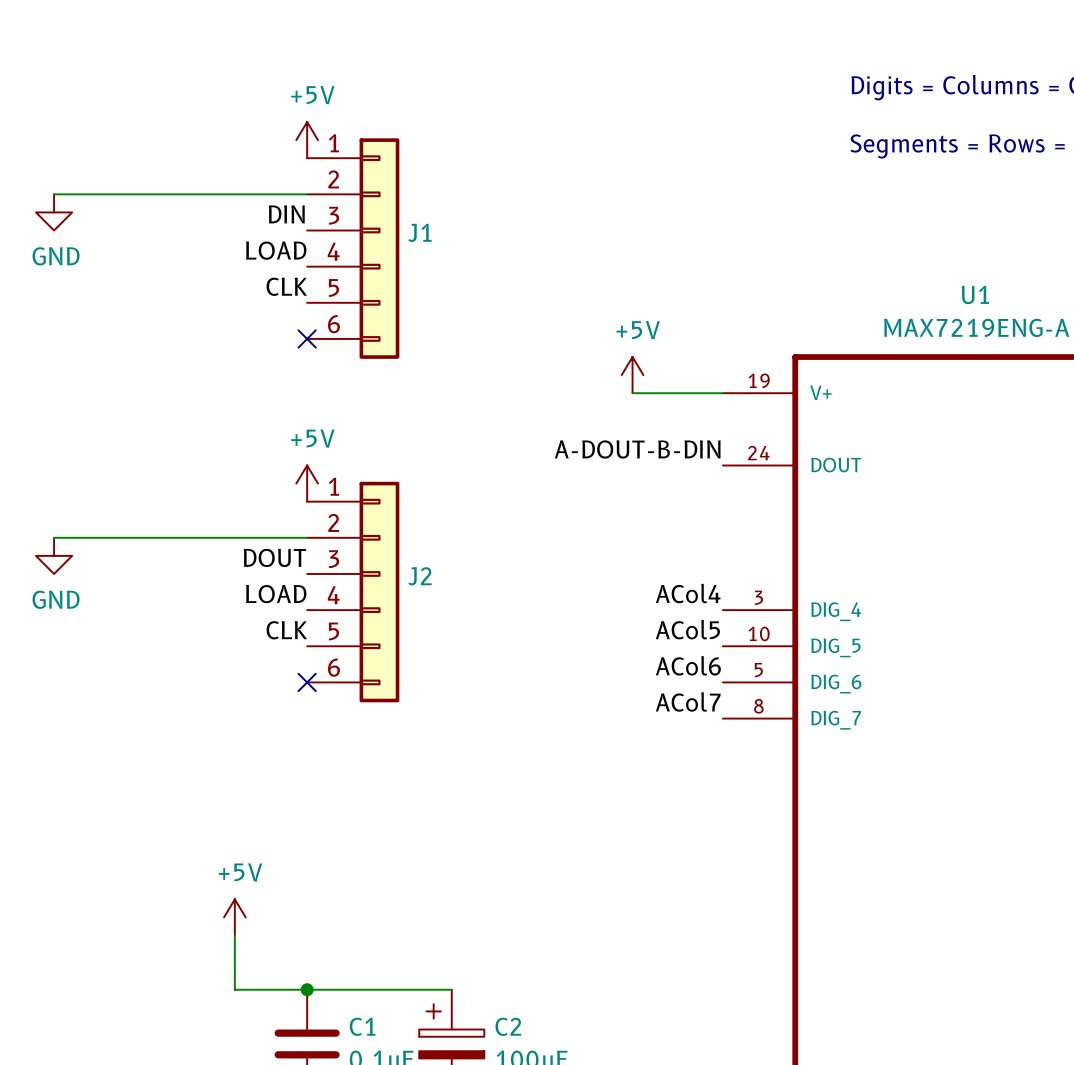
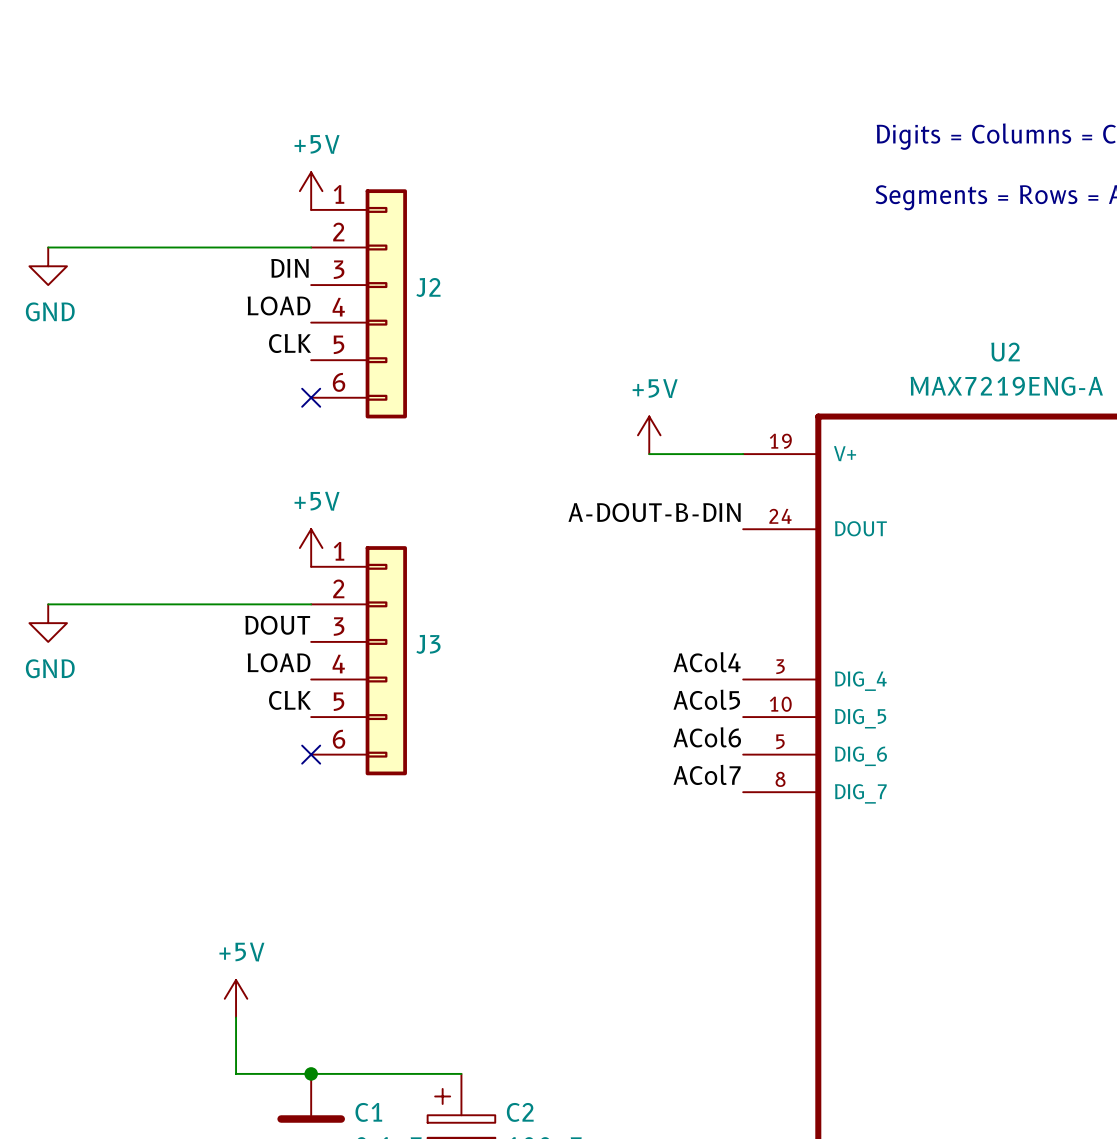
J1 name: J1 (419, 232) -> J2 (428, 287)
U1 name: U1 (975, 295) -> U2 (1005, 352)
J2 name: J2 (420, 576) -> J3 (428, 644)

